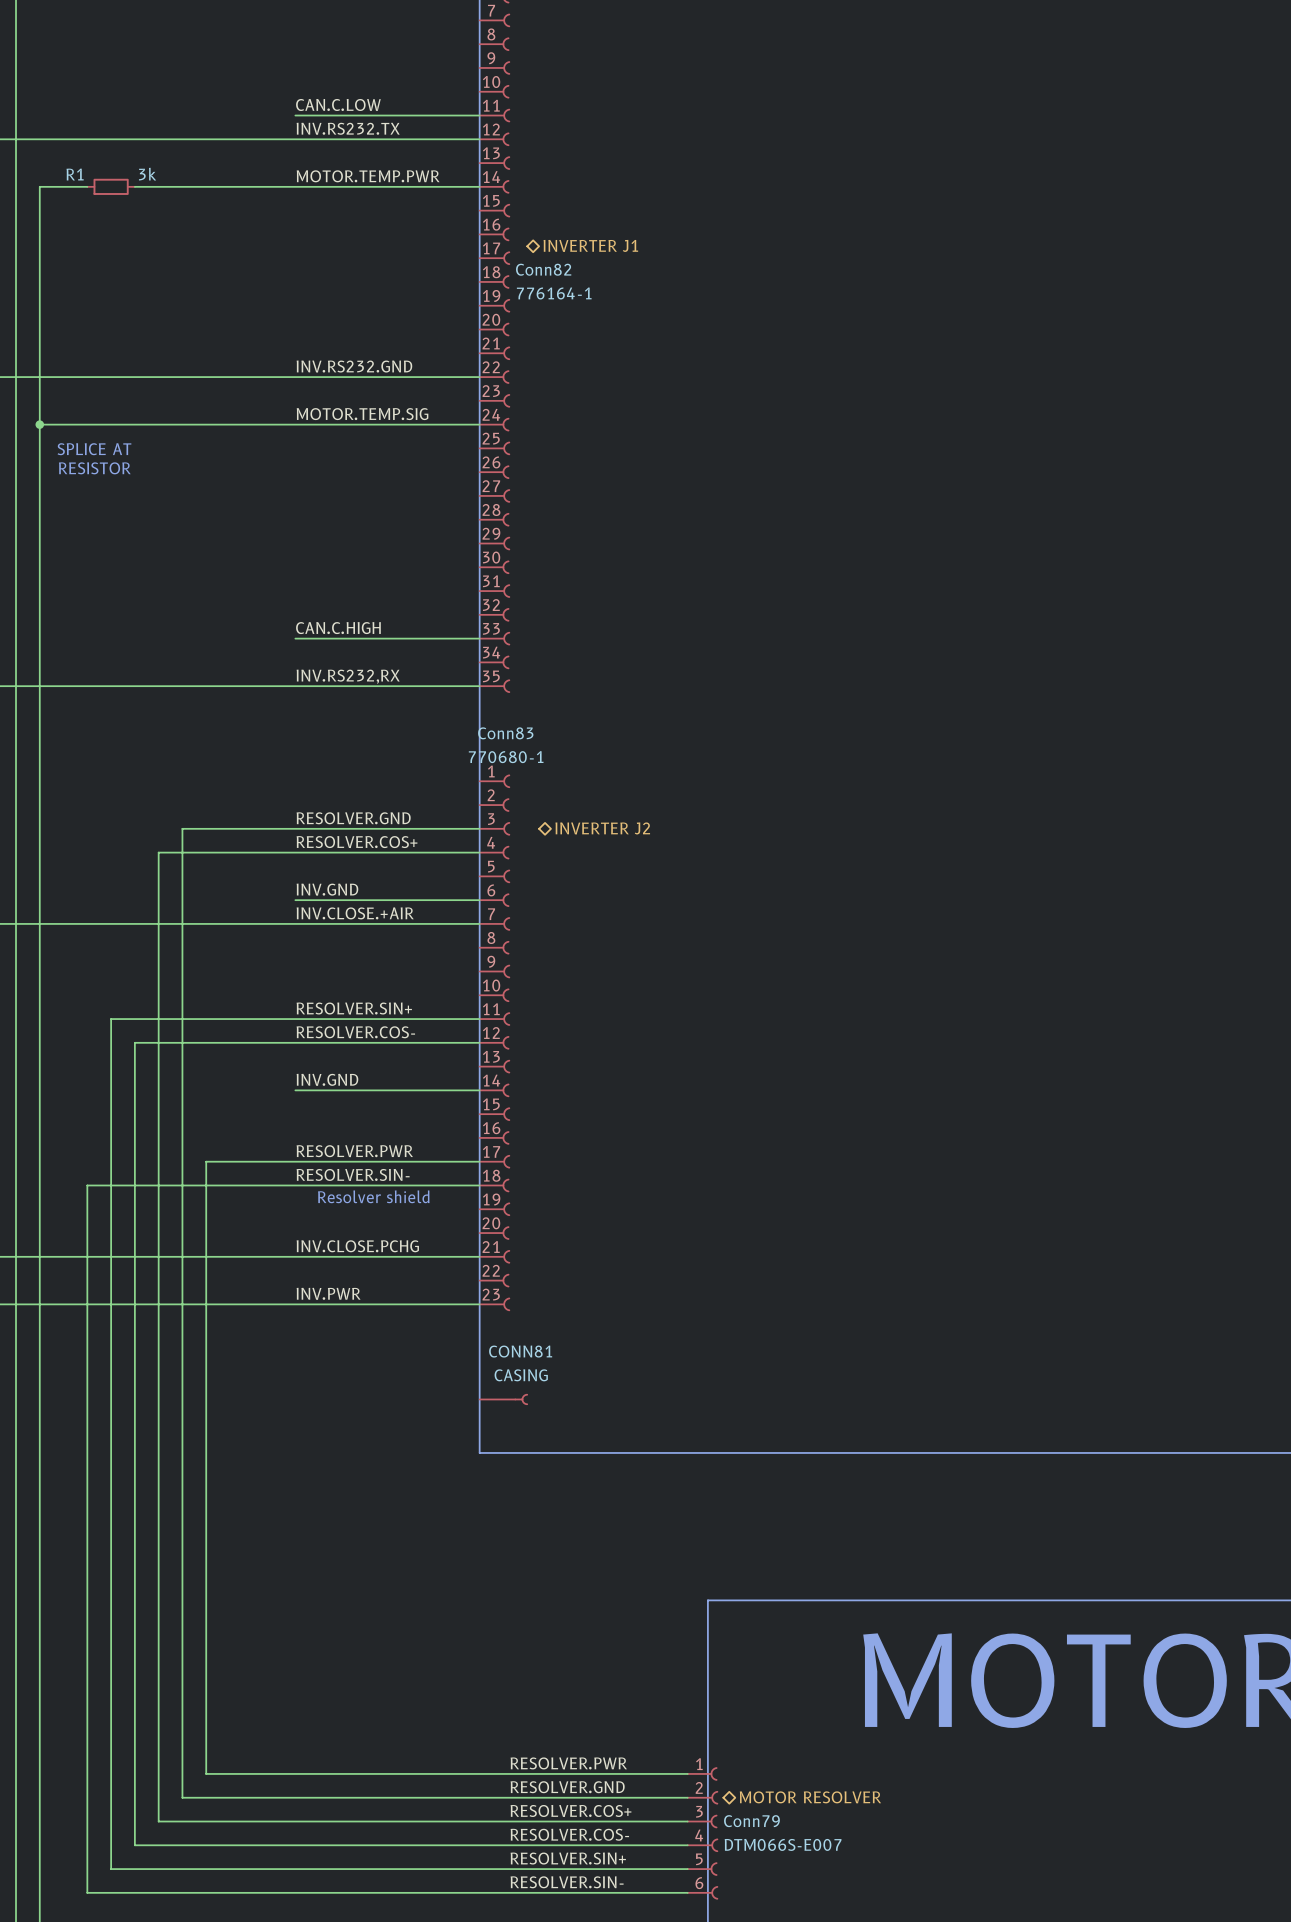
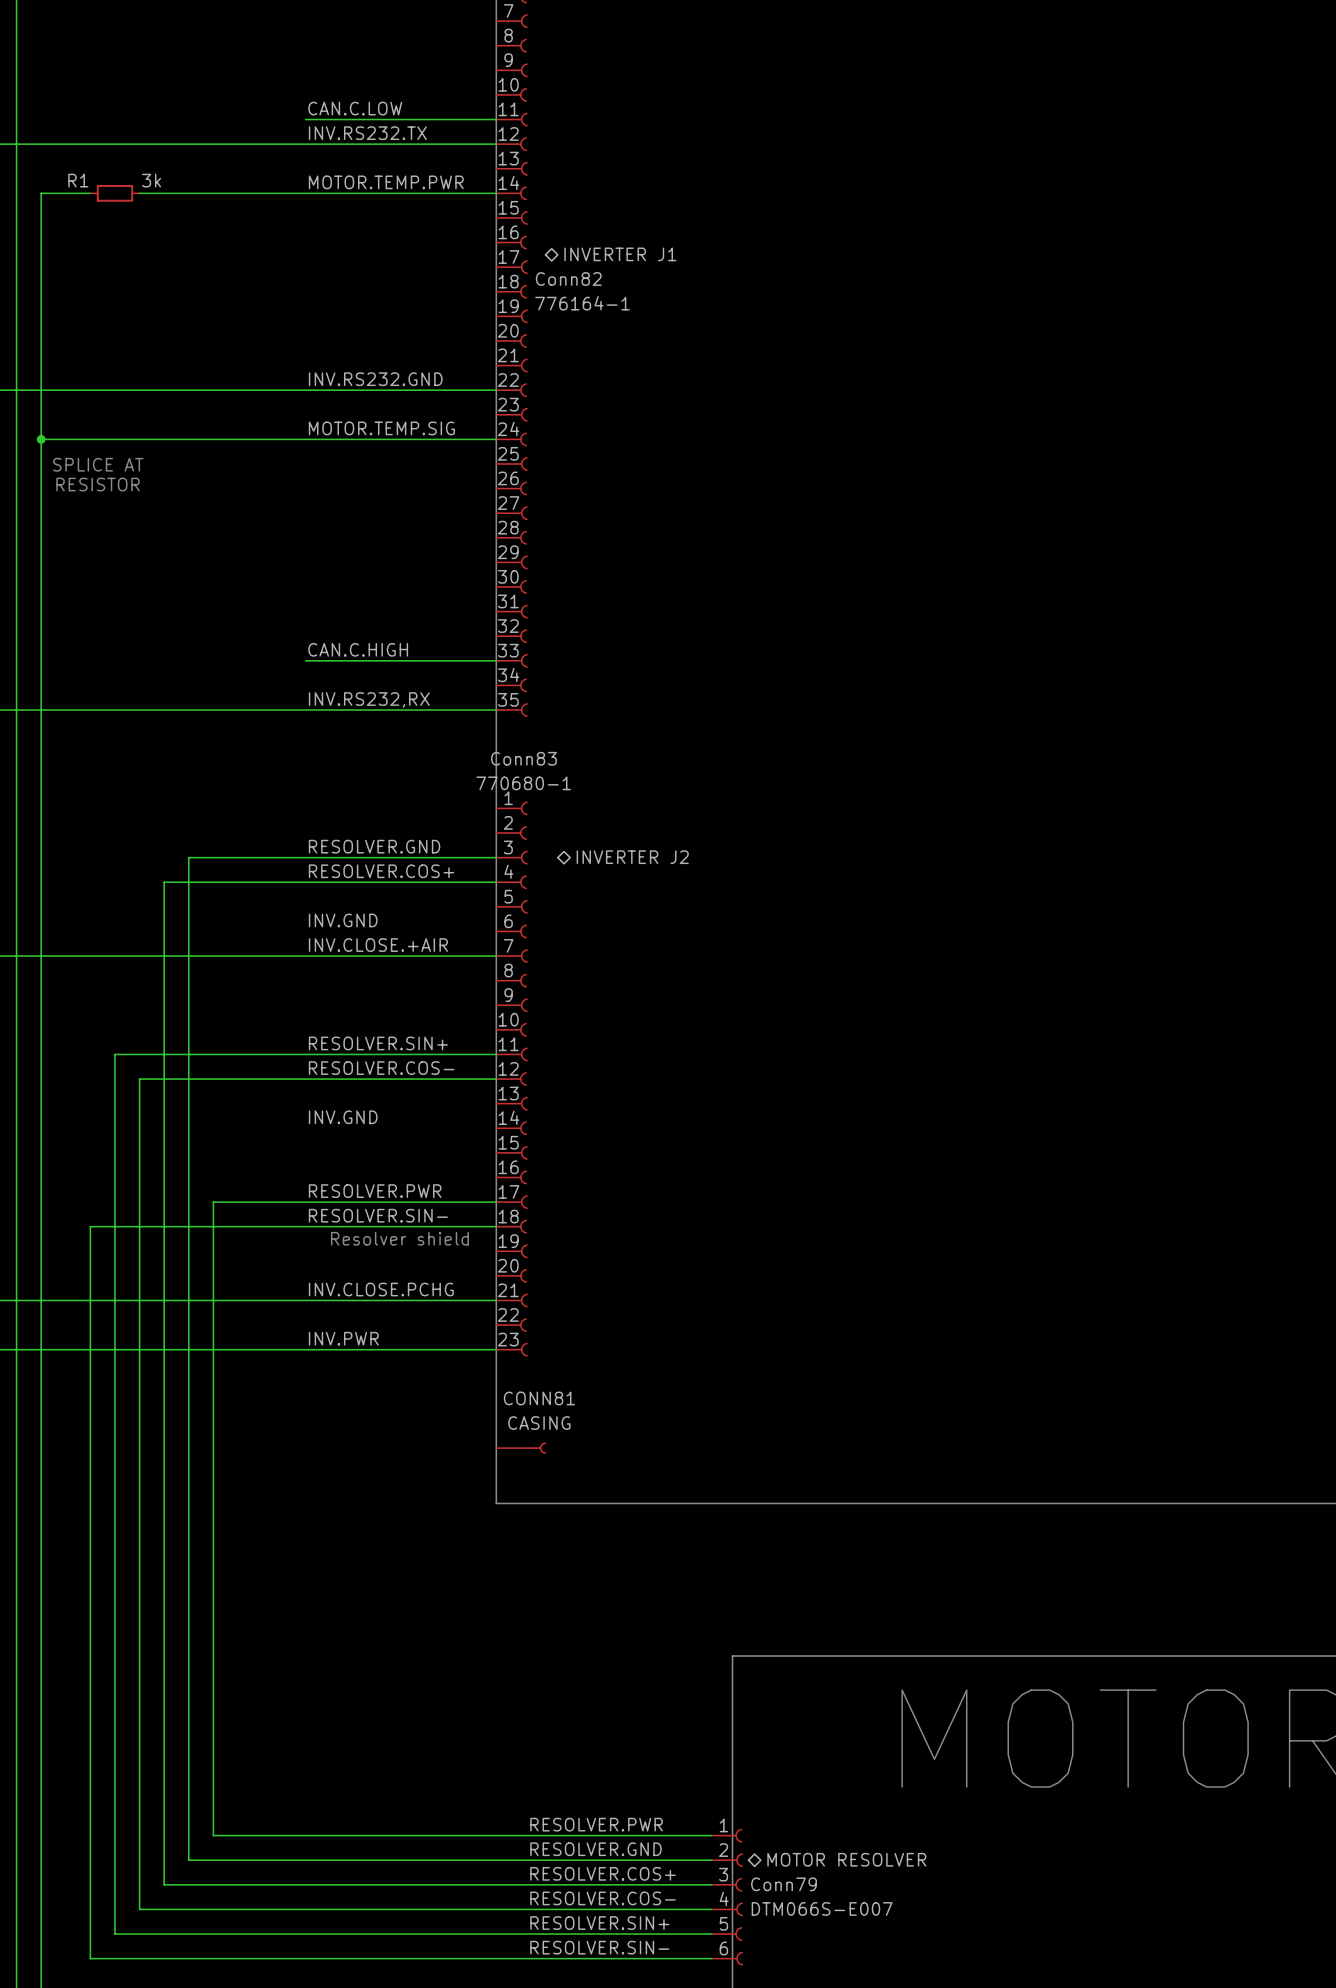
wire: (295, 900) (479, 900) -> none
wire: (295, 1090) (479, 1090) -> none

